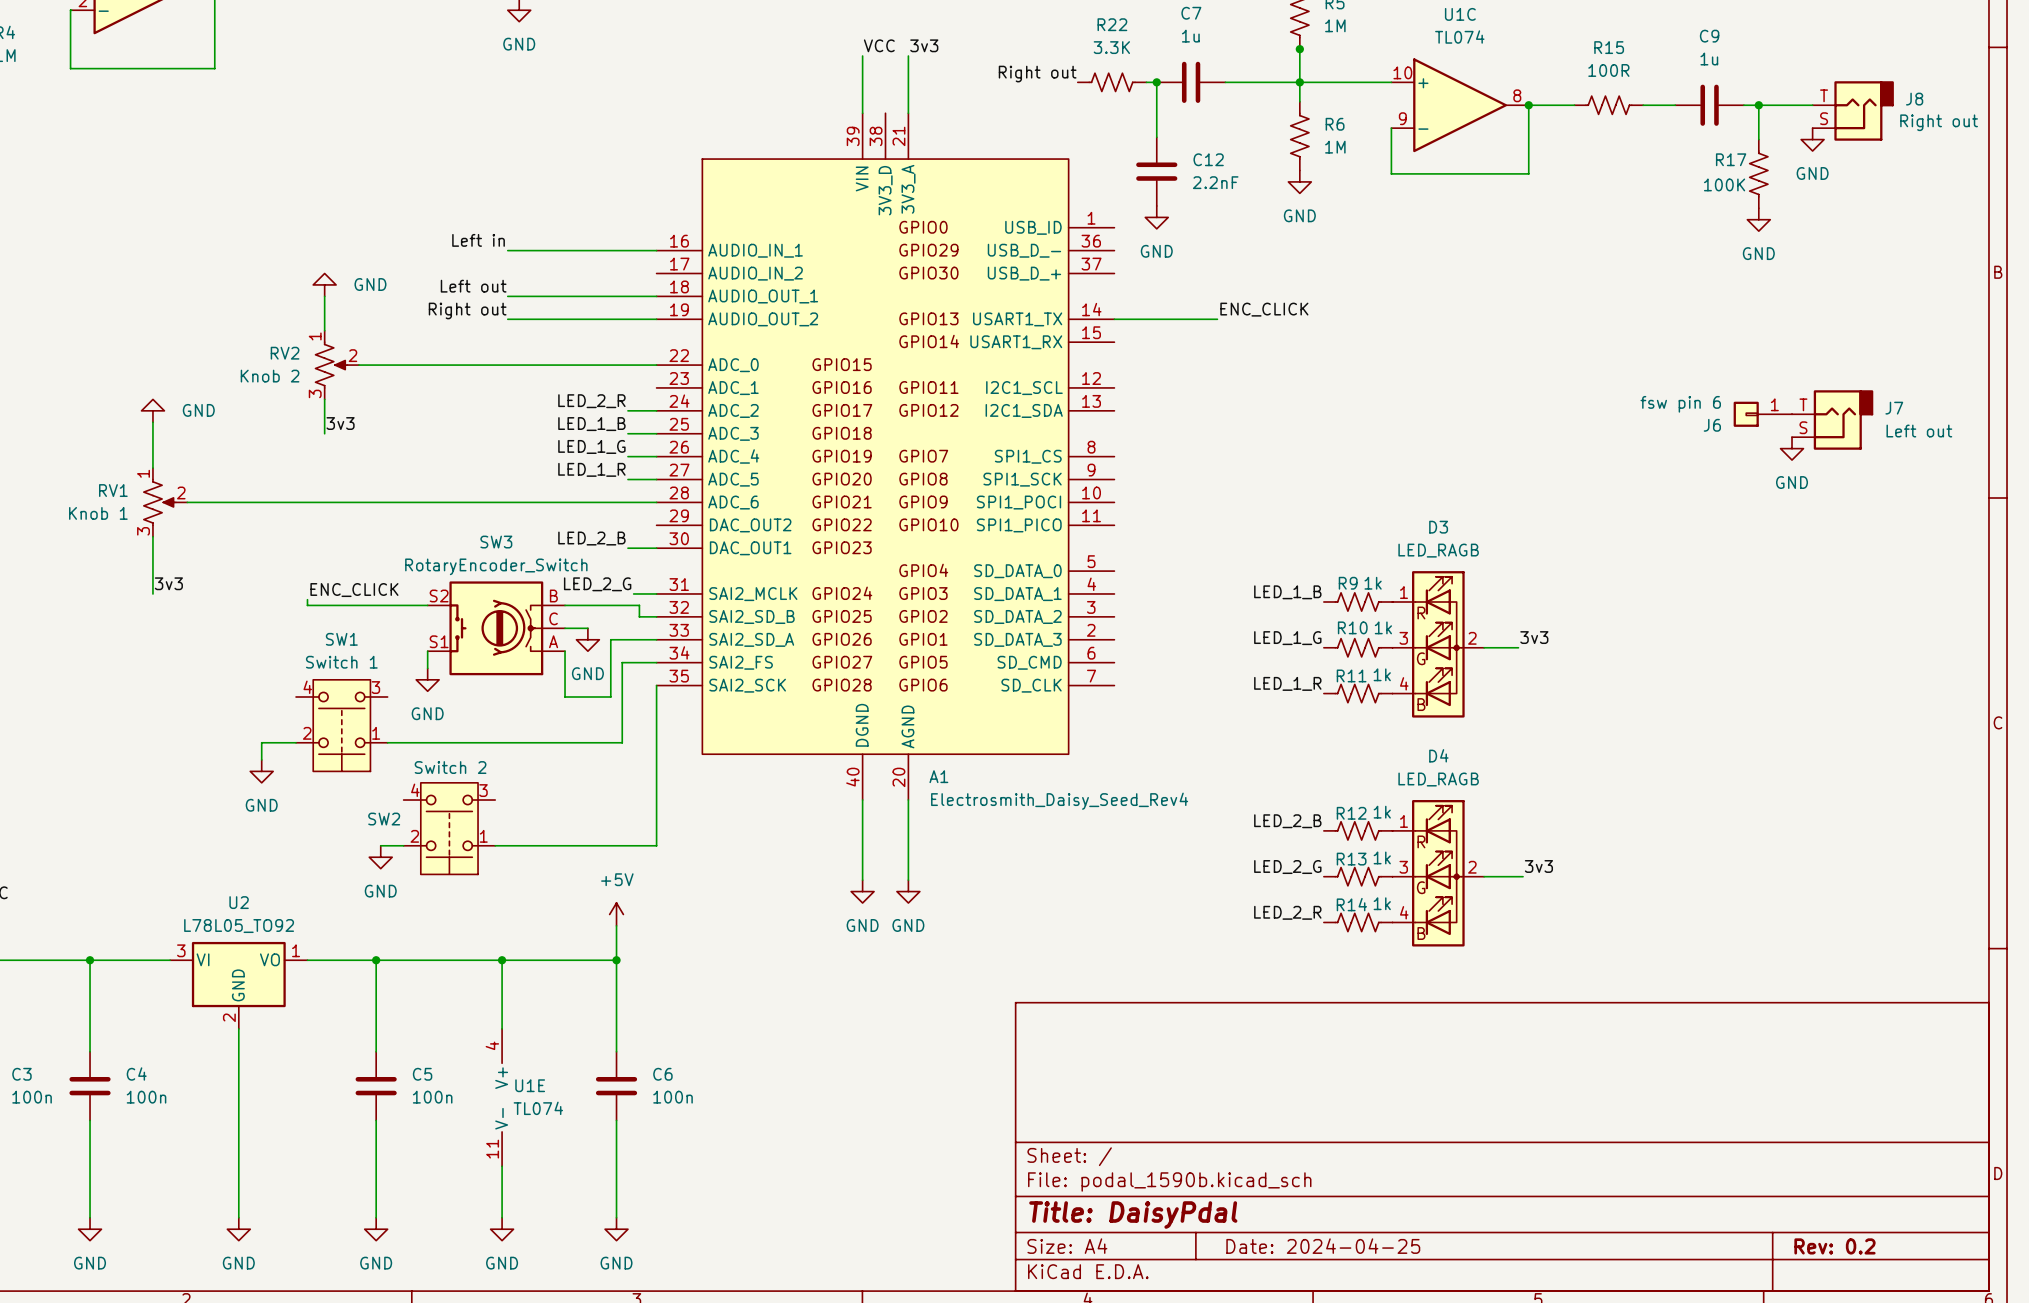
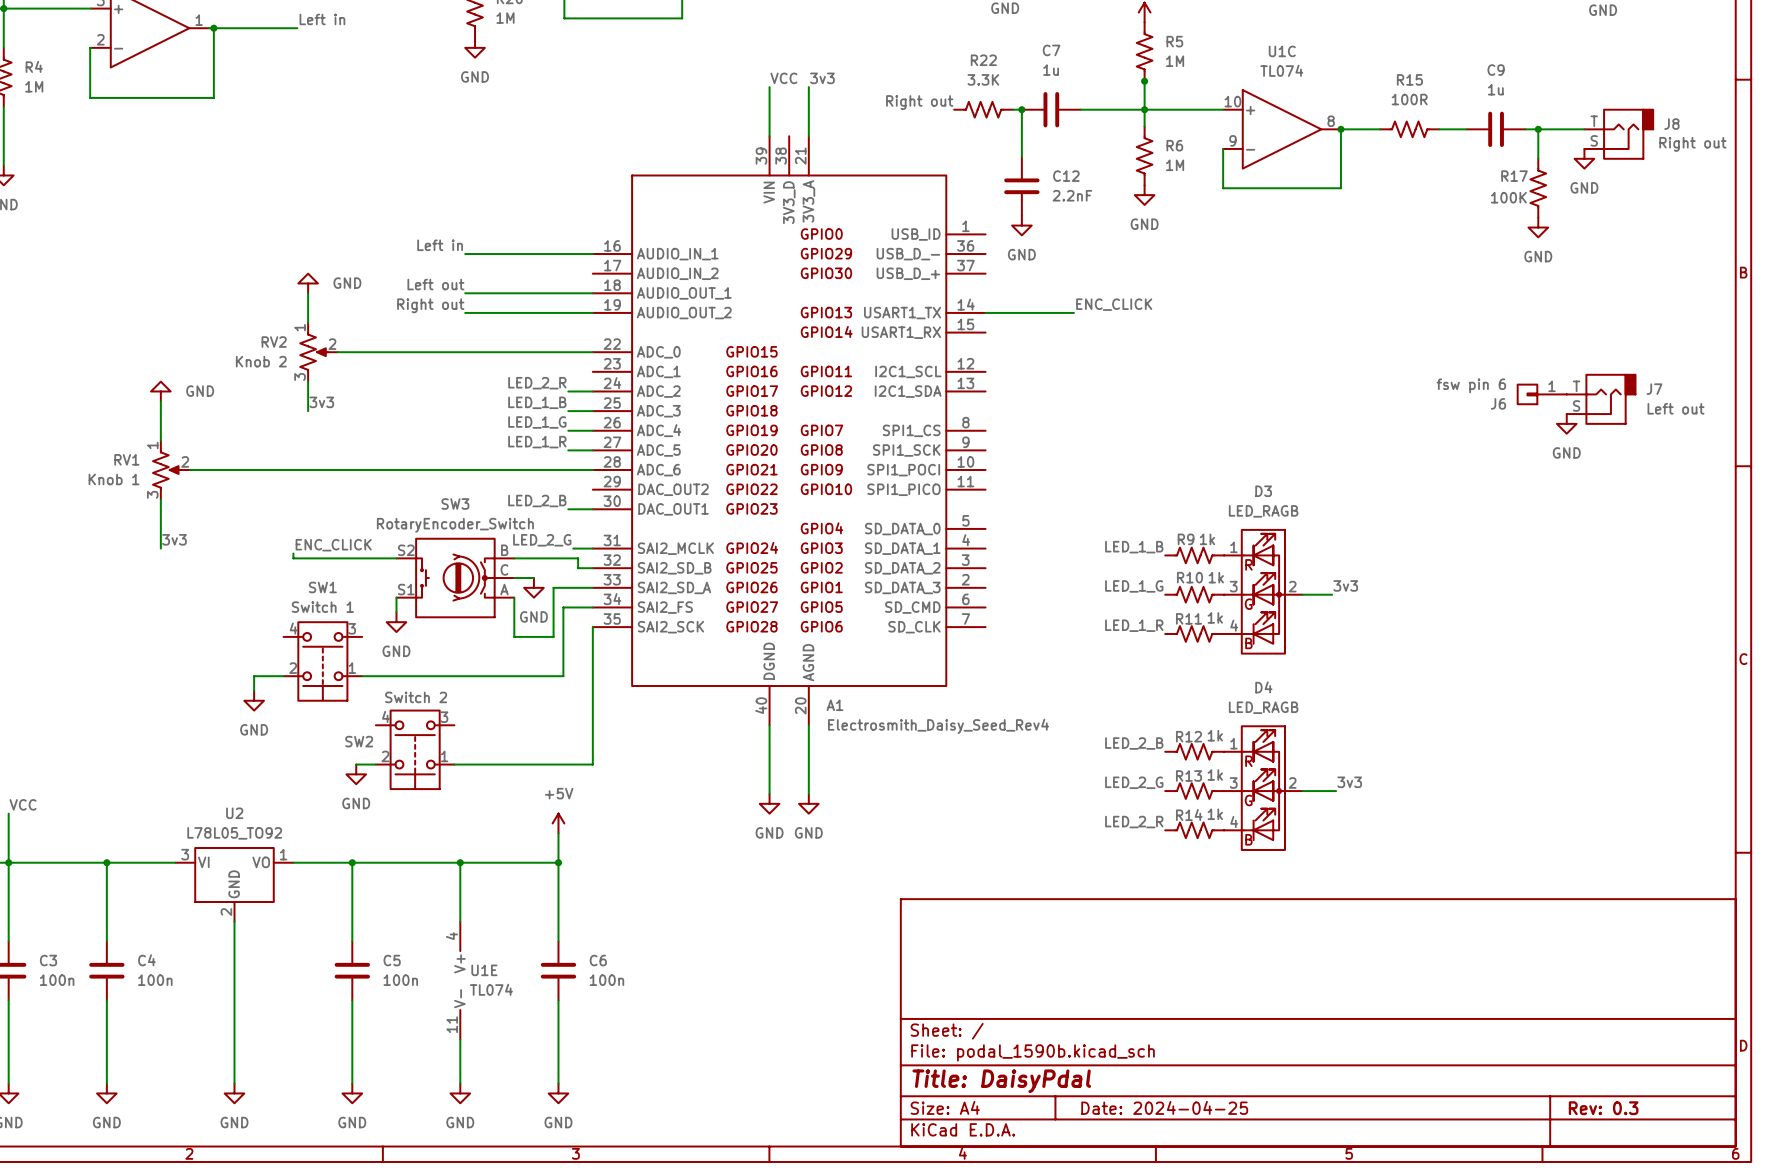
title block: Rev: 0.2 (1834, 1246) -> Rev: 0.3 (1603, 1108)

